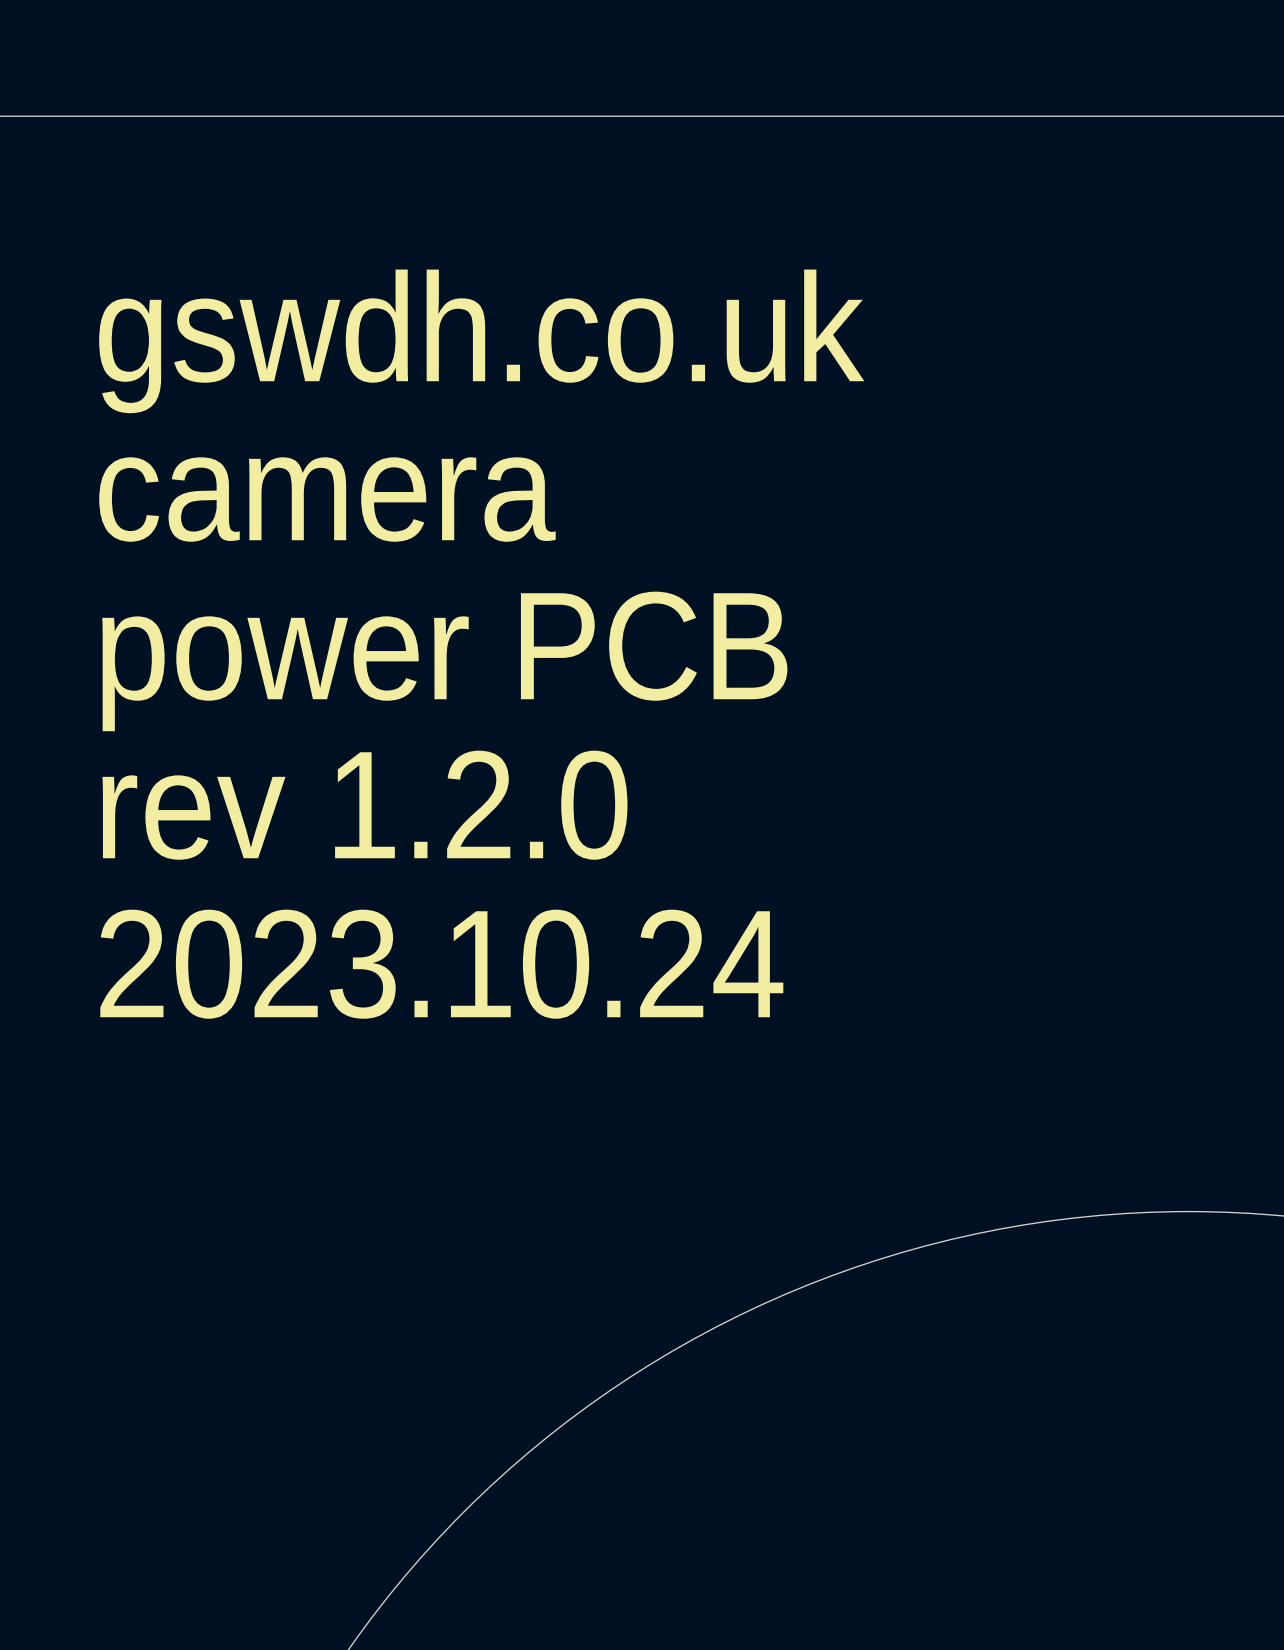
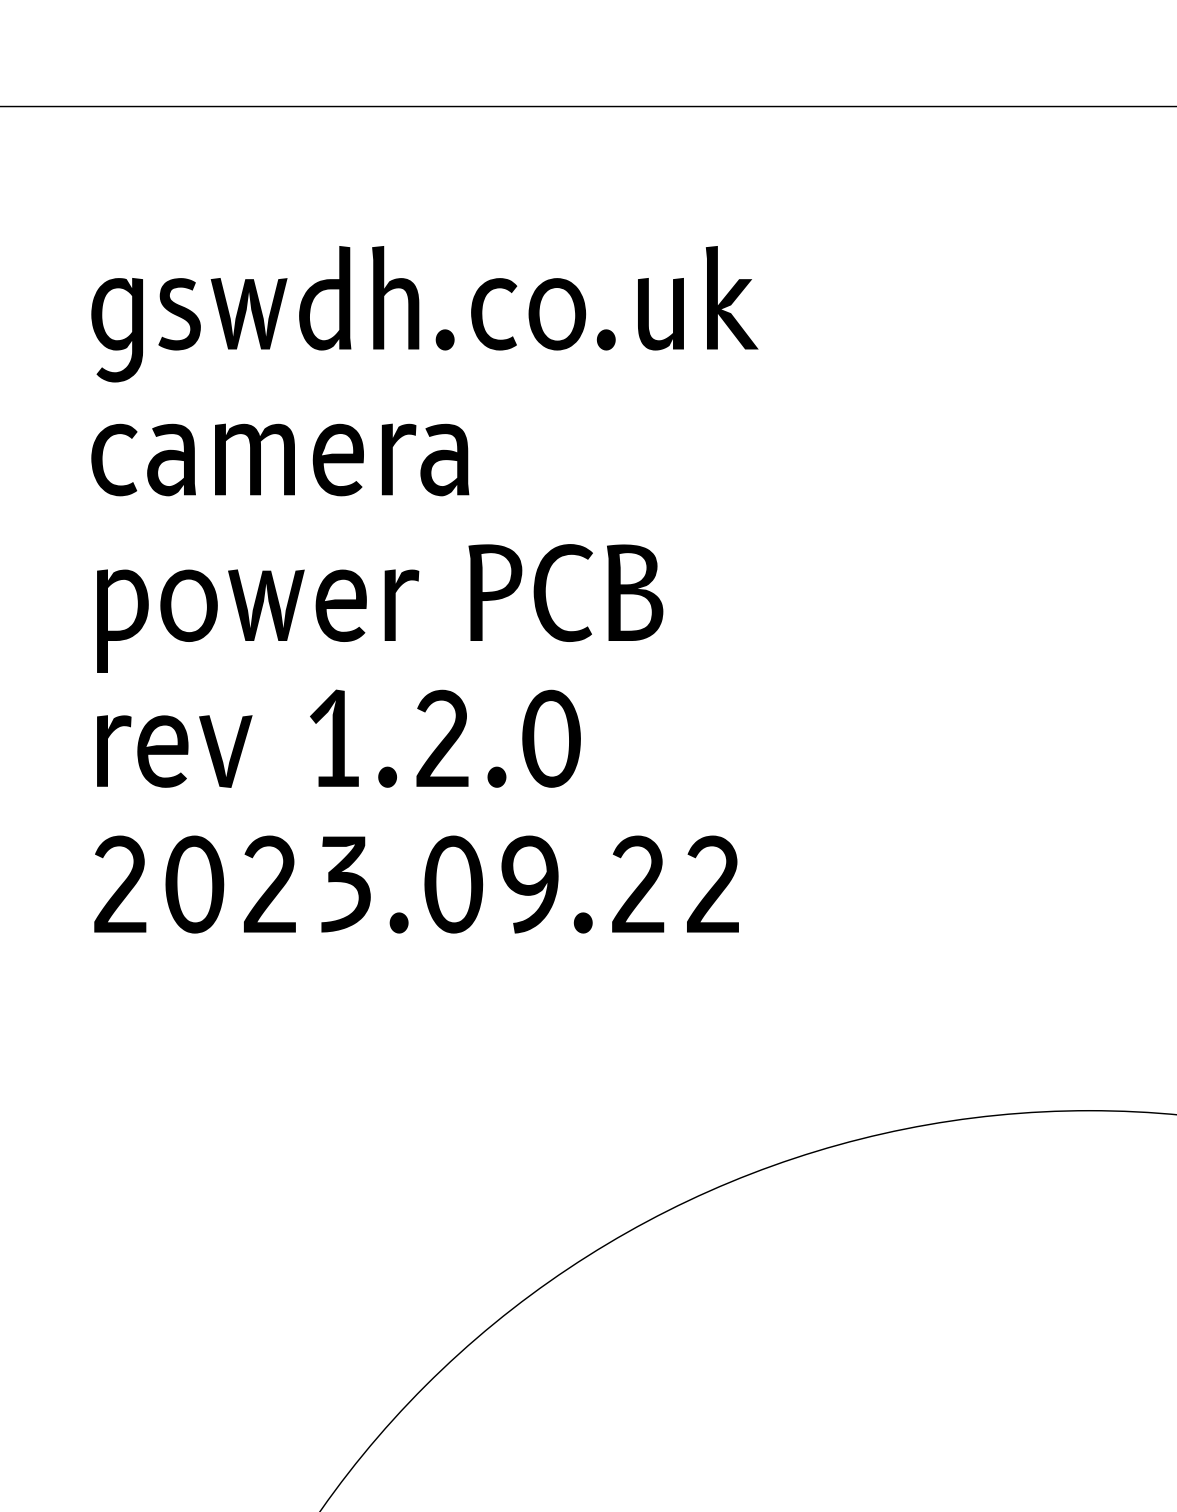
text: 2023.10.24 (441, 964) -> 2023.09.22 (416, 884)

